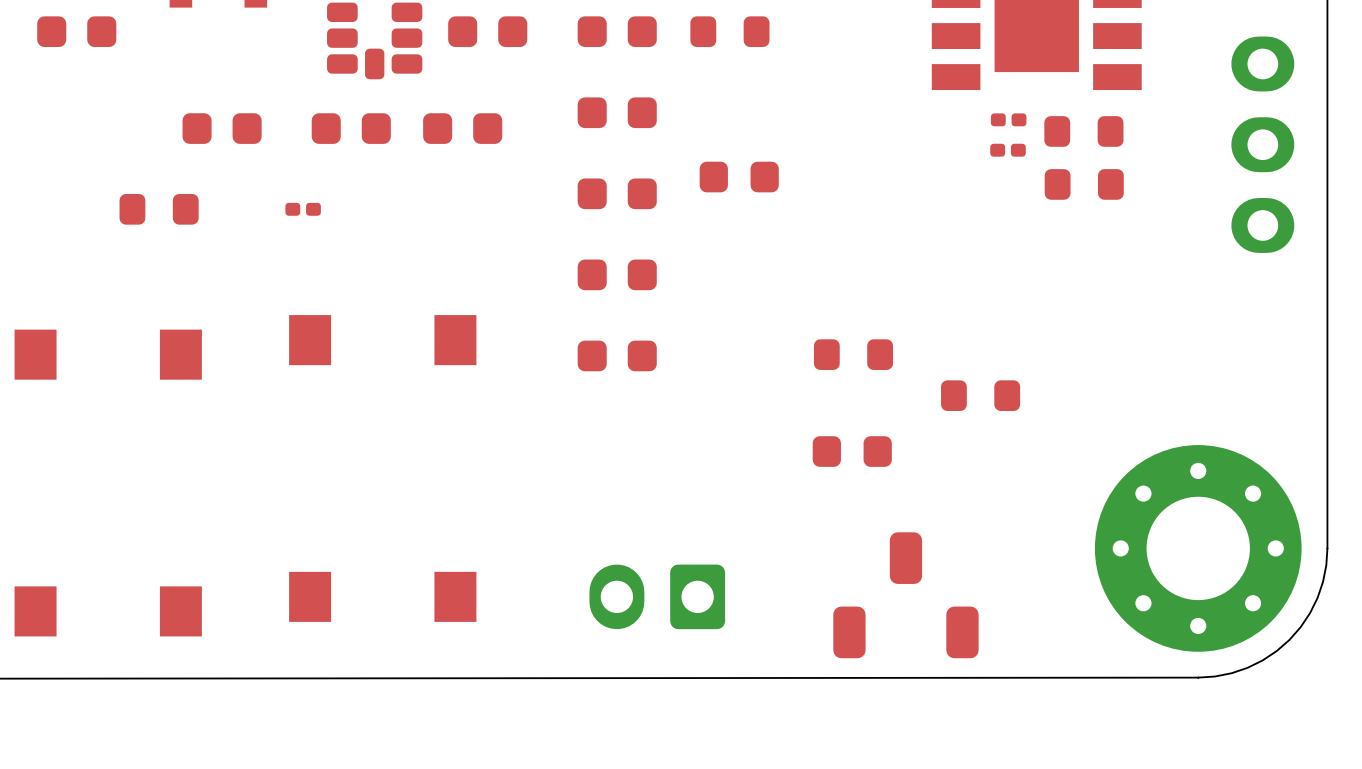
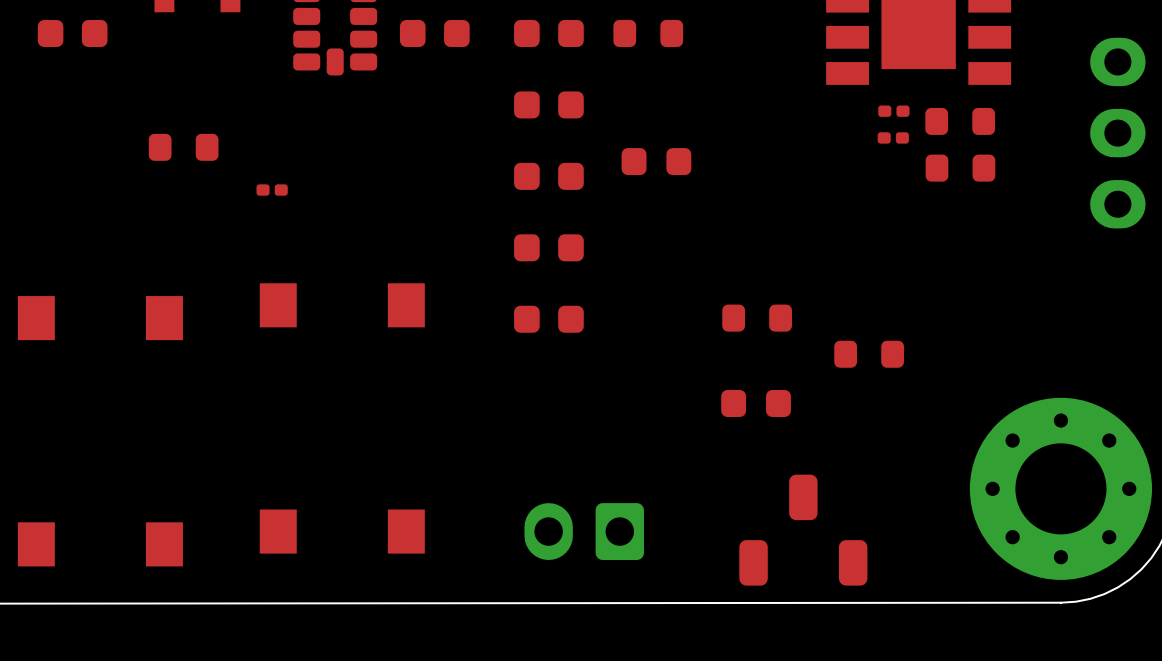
part: (222, 128) -> none
part: (351, 128) -> none
part: (462, 128) -> none
part position: (159, 209) -> (183, 147)

